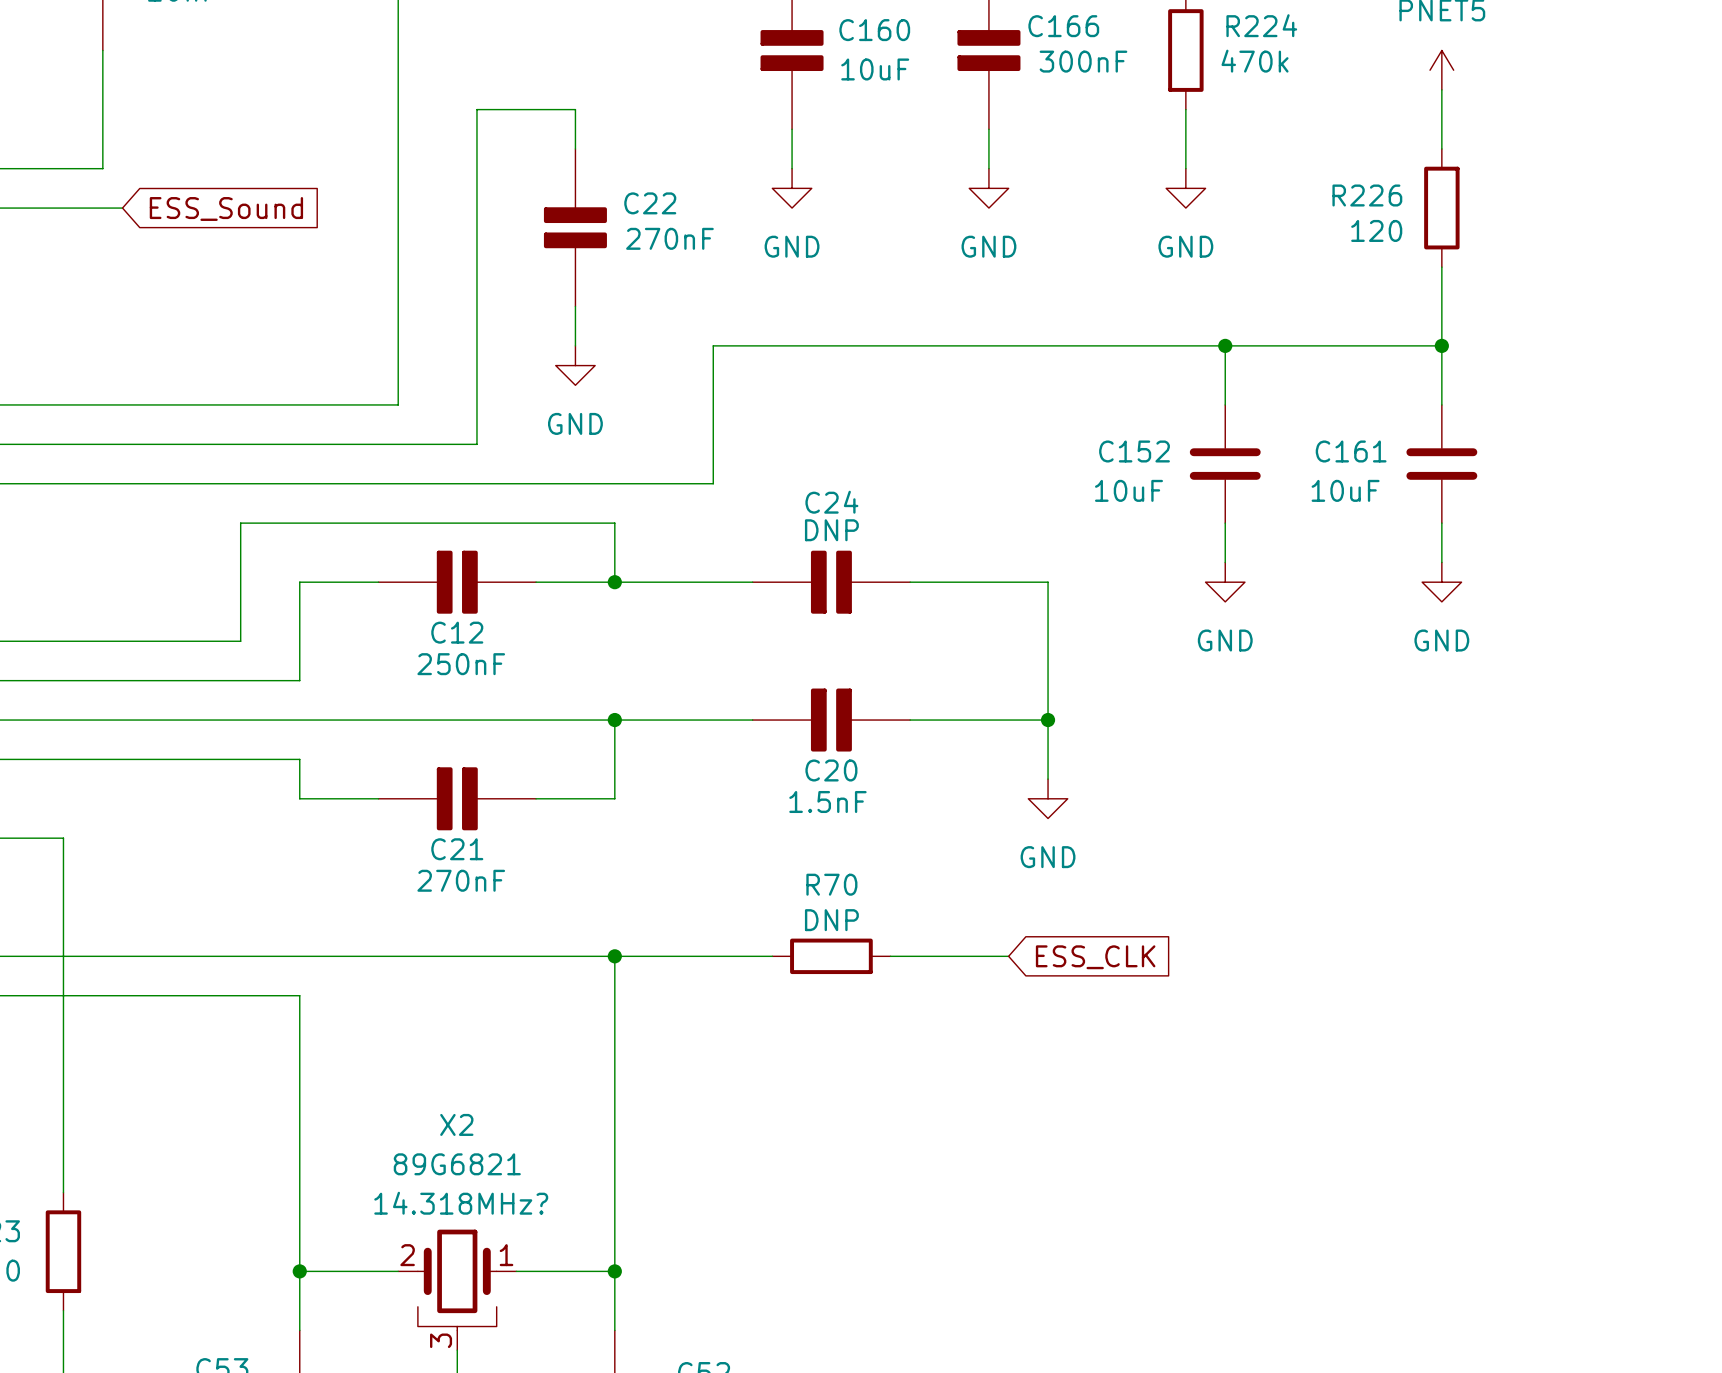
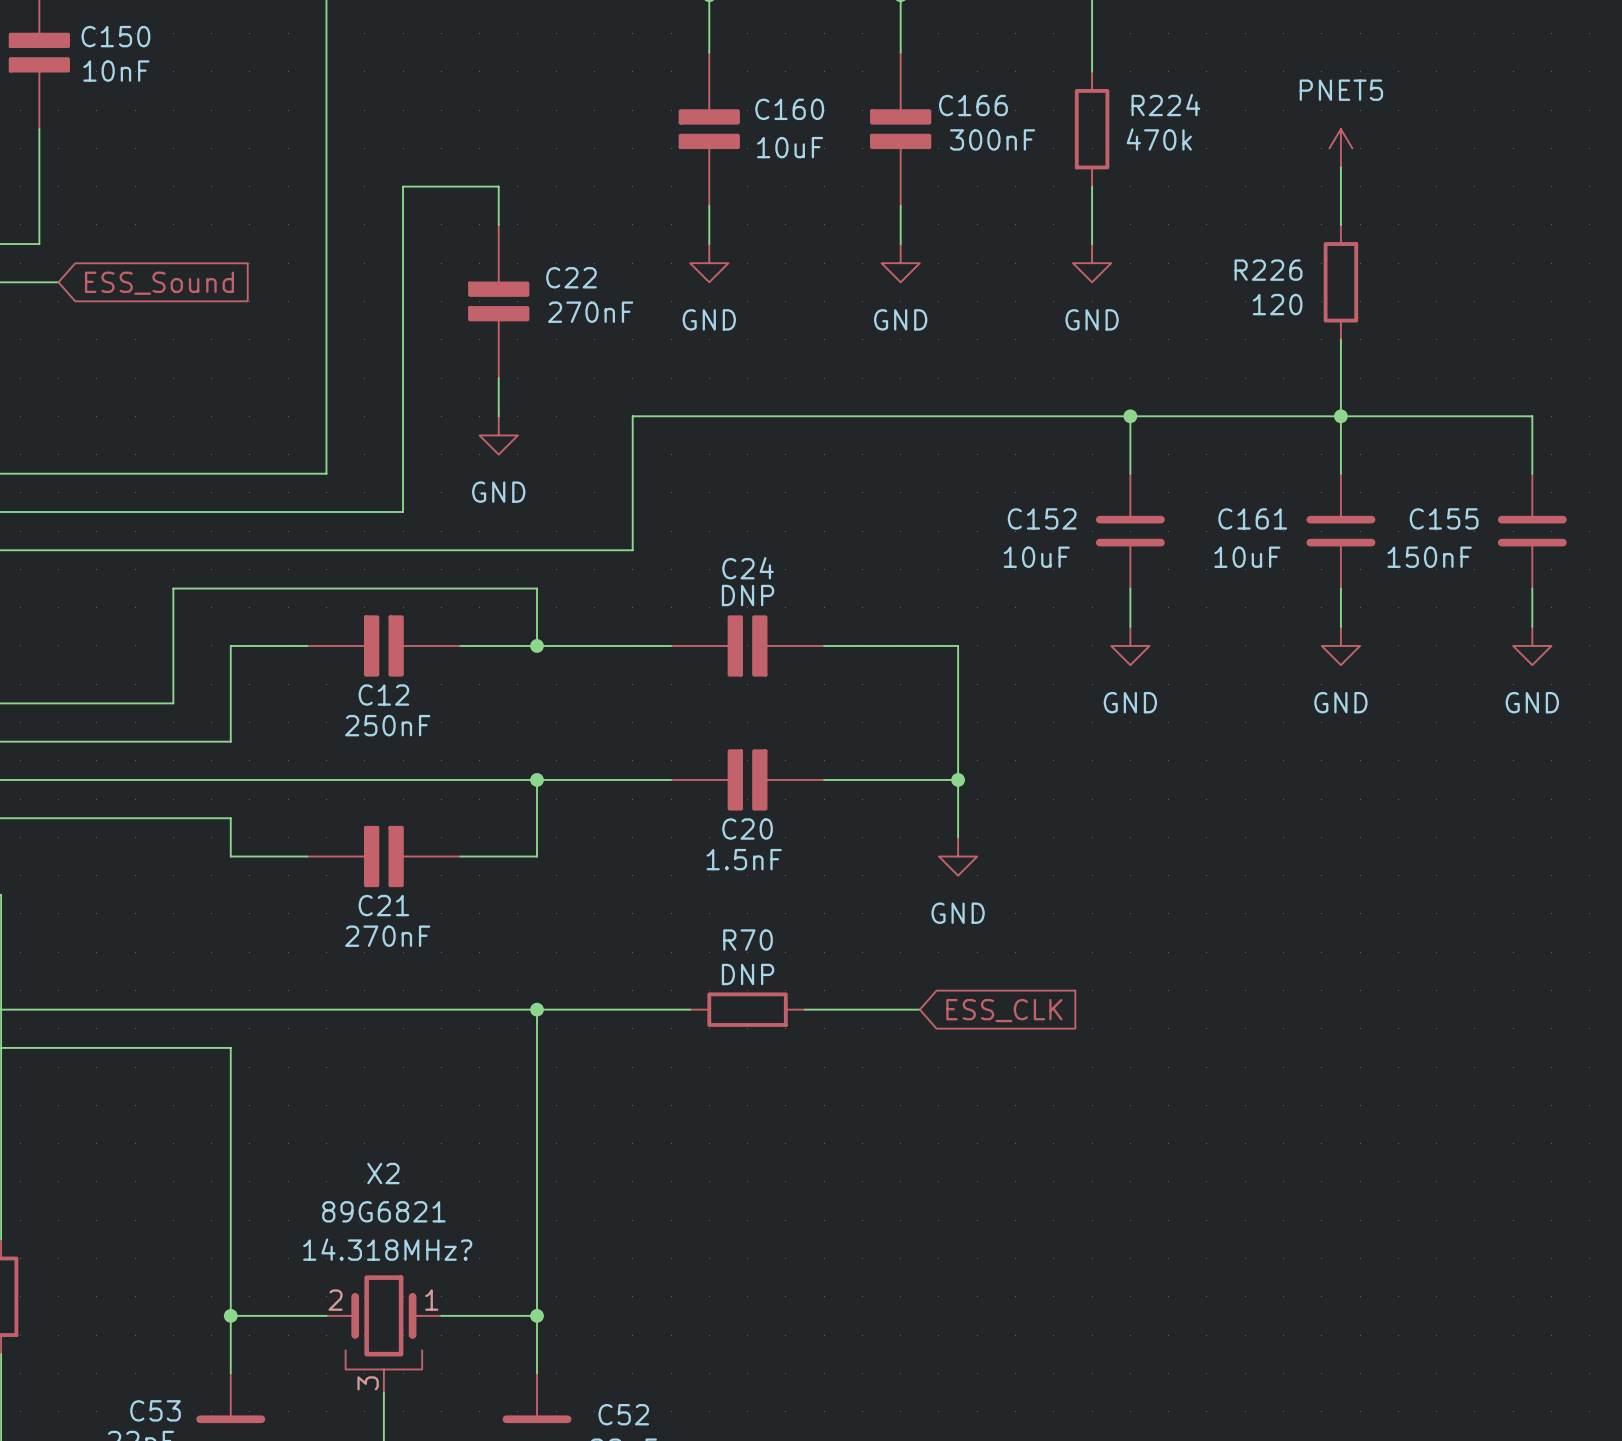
wire: none -> (1340, 416) (1532, 416) (1532, 473)
C155: none -> 150nF (1532, 531)
wire: none -> (1532, 588) (1532, 626)
power symbol: none -> GND (1532, 645)

